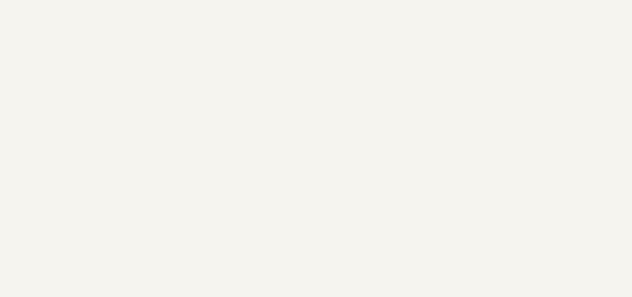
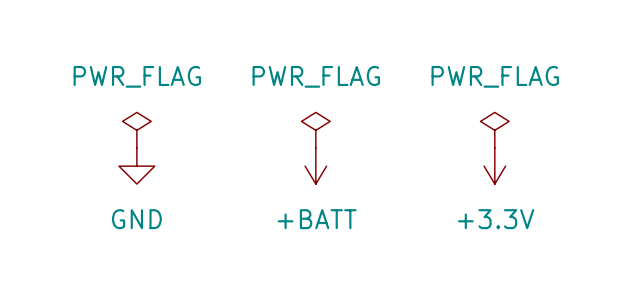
power symbol: none -> PWR_FLAG (136, 130)
power symbol: none -> PWR_FLAG (315, 130)
power symbol: none -> PWR_FLAG (494, 130)
power symbol: none -> GND (136, 166)
power symbol: none -> +BATT (315, 166)
power symbol: none -> +3.3V (494, 166)

